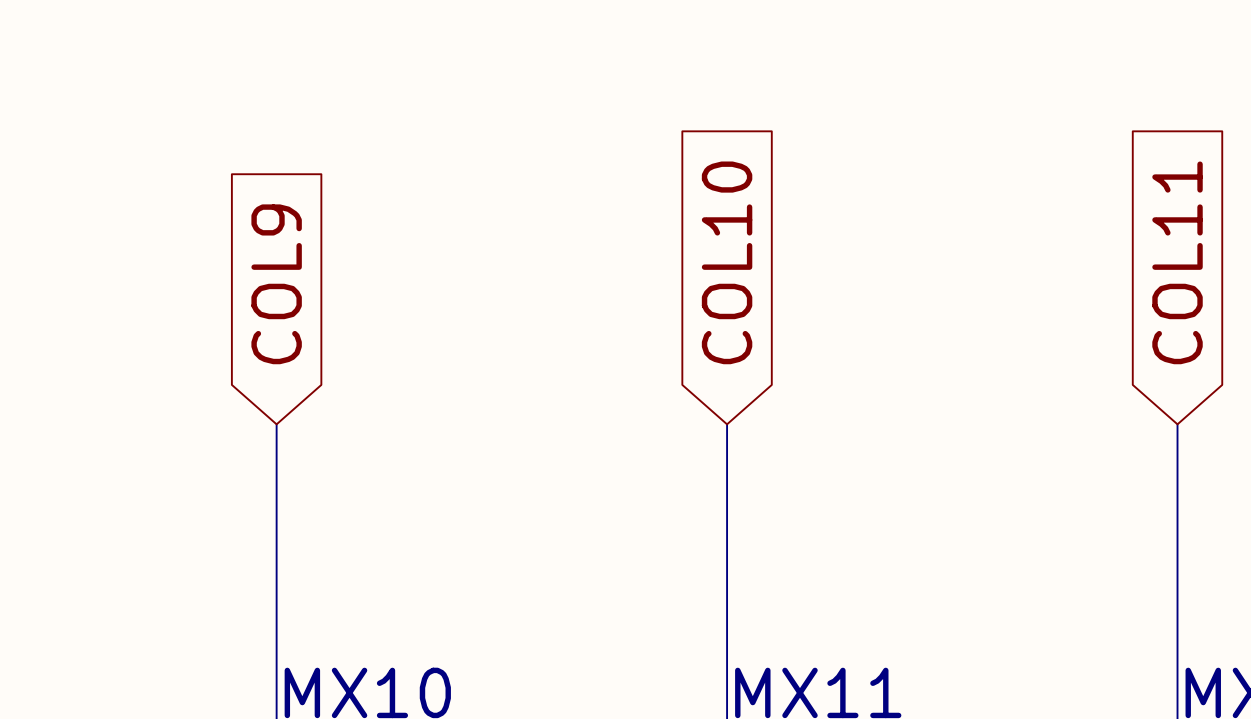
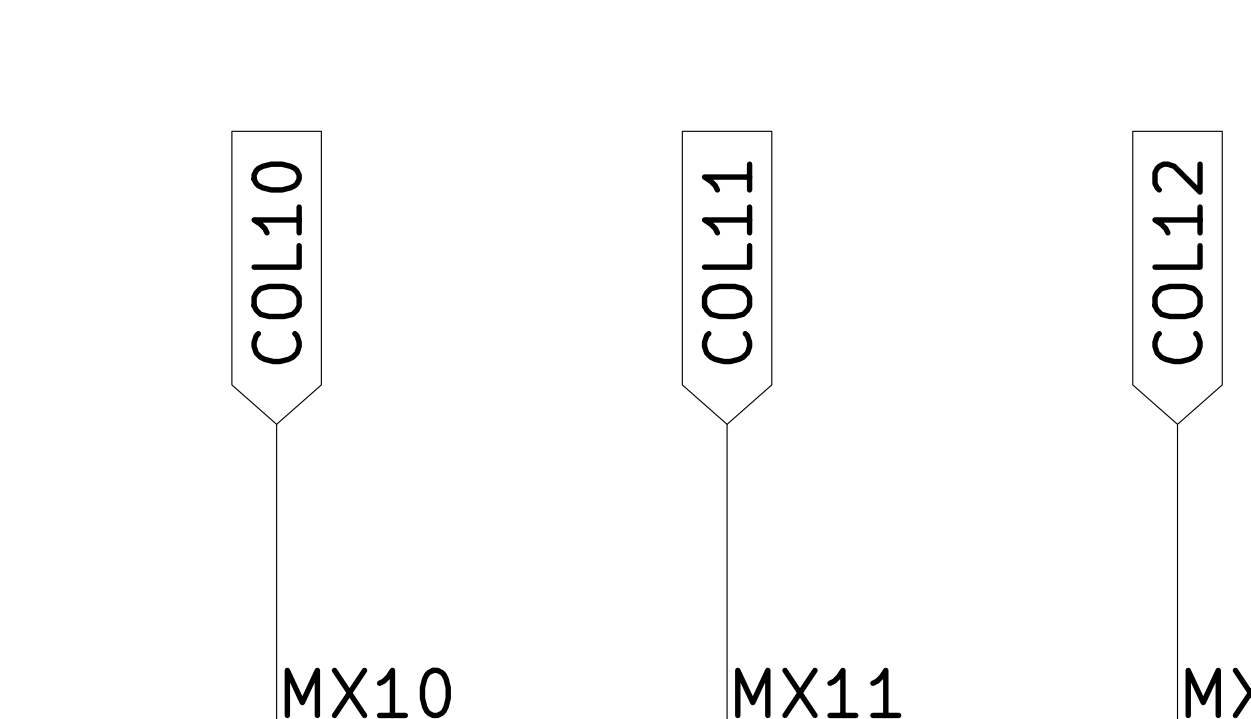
global label: COL10 (727, 262) -> COL11 (727, 262)
global label: COL11 (1177, 262) -> COL12 (1177, 262)
global label: COL9 (276, 284) -> COL10 (276, 262)

